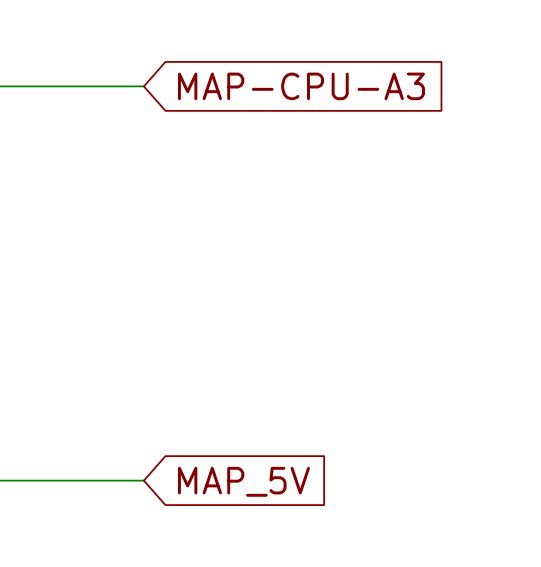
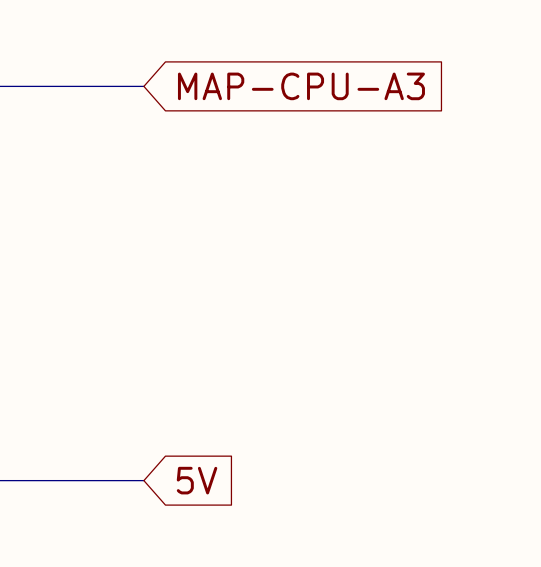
global label: MAP_5V (243, 481) -> 5V (197, 480)

